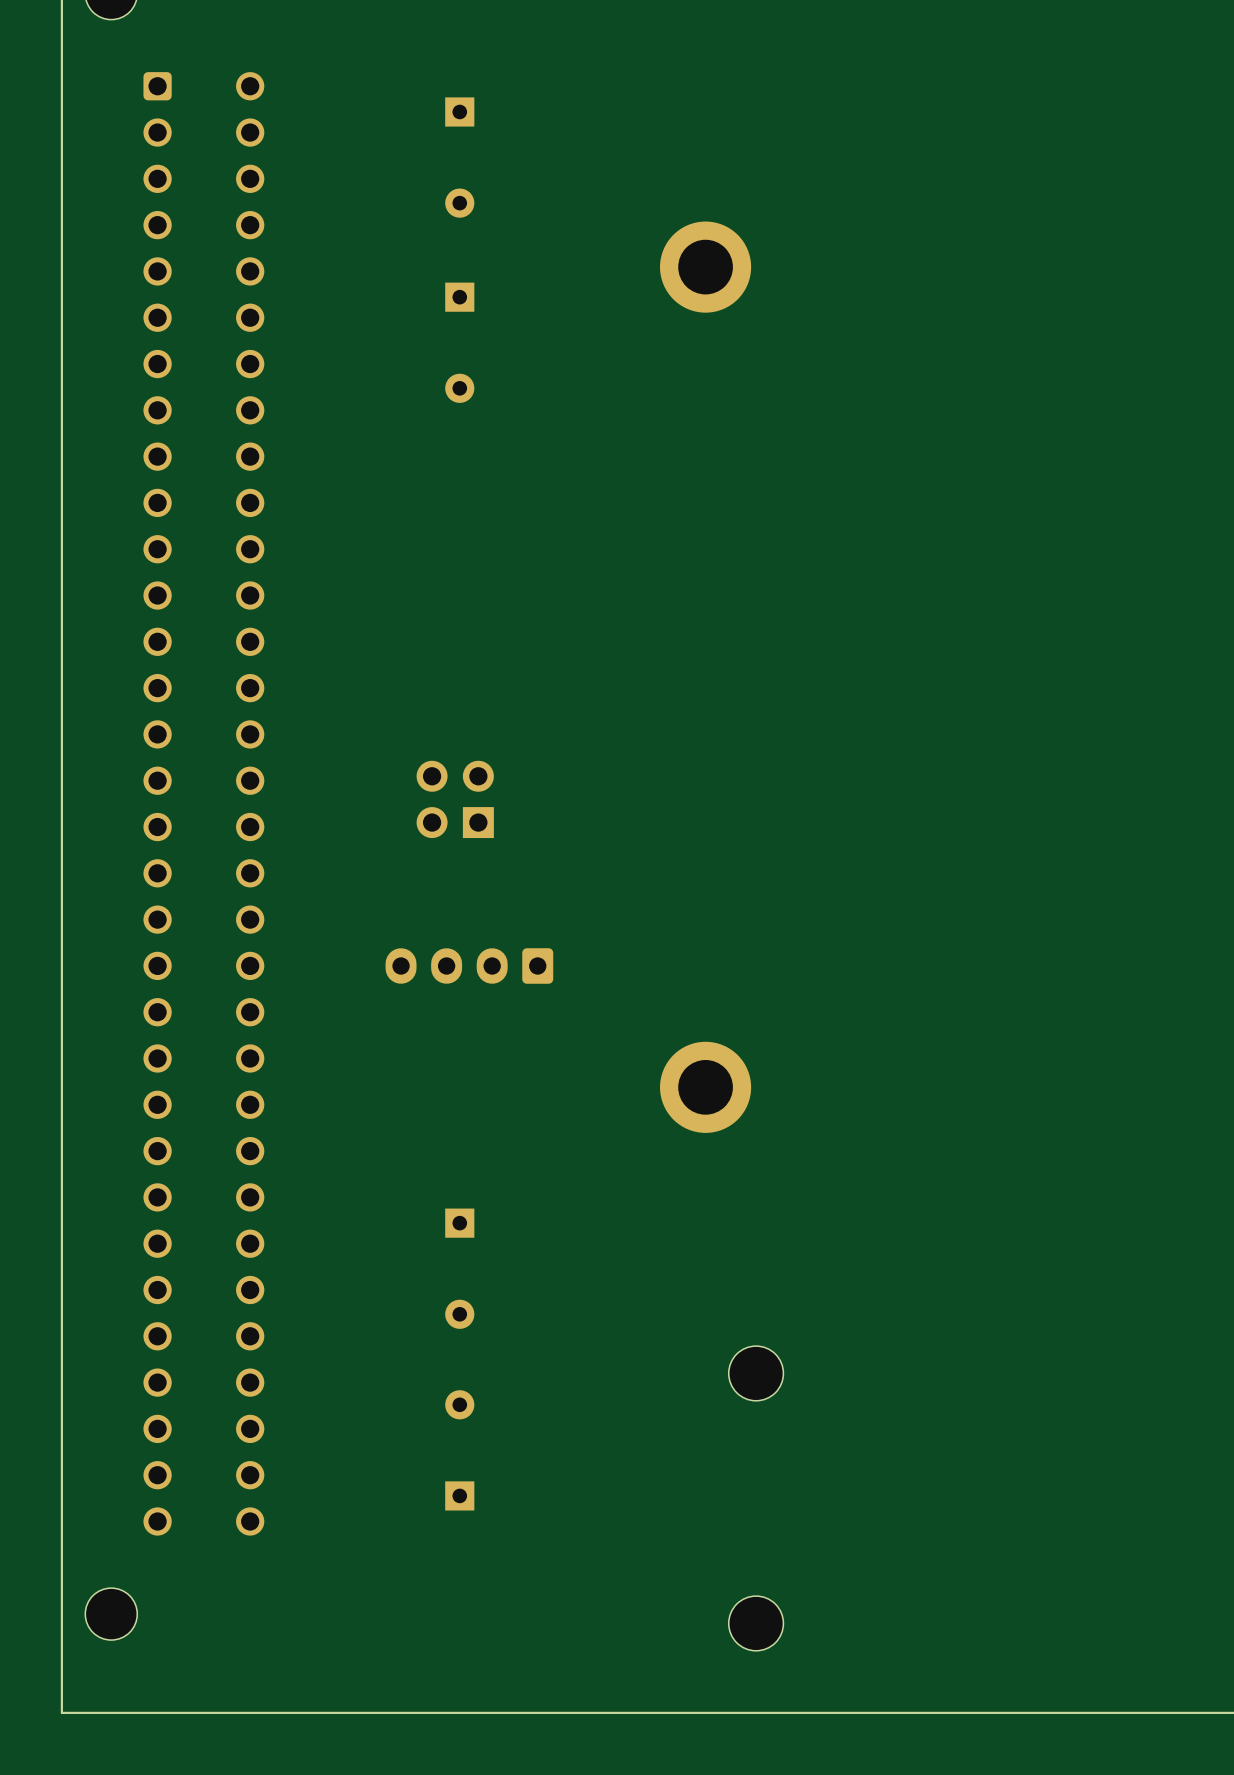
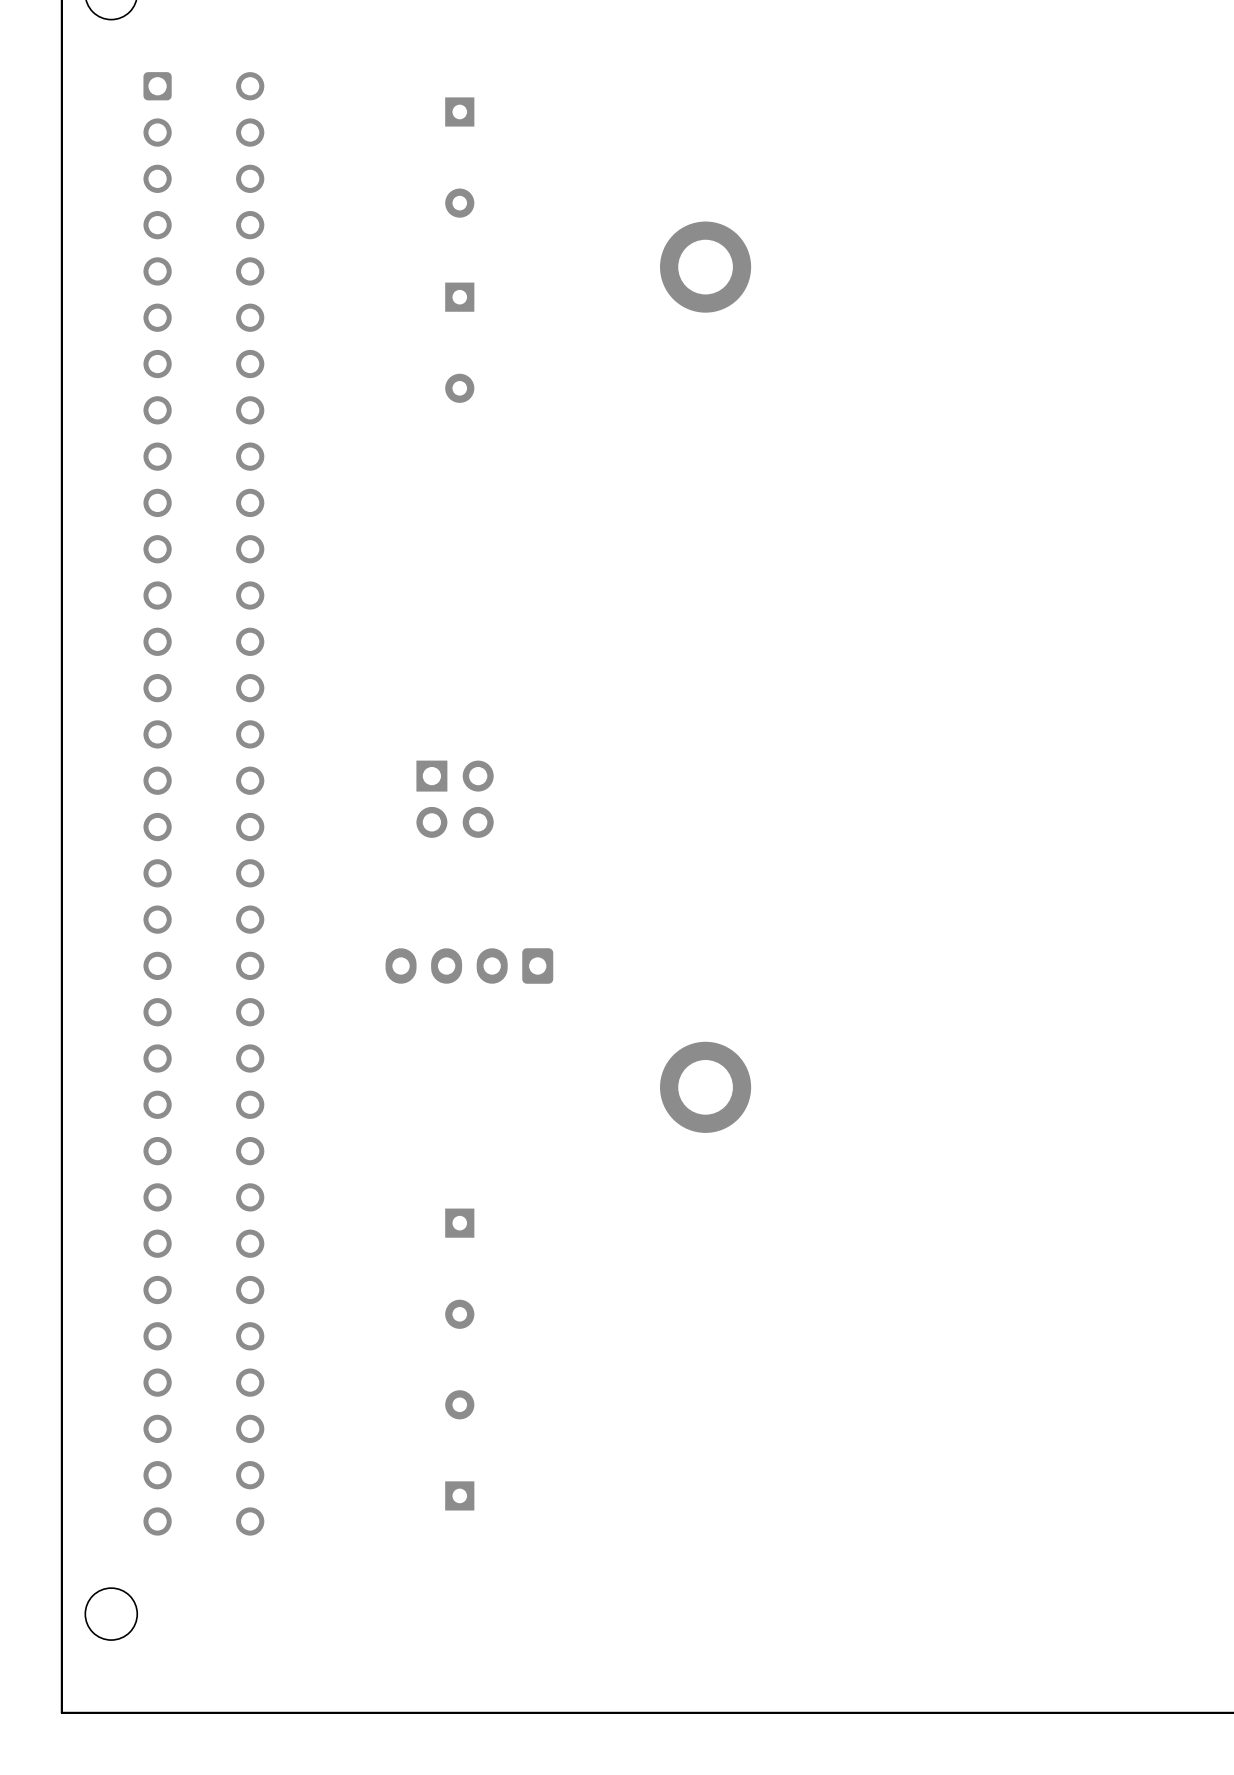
part rotation: 0° (455, 799) -> 180° (455, 799)
part: (756, 1373) -> none
part: (756, 1623) -> none

